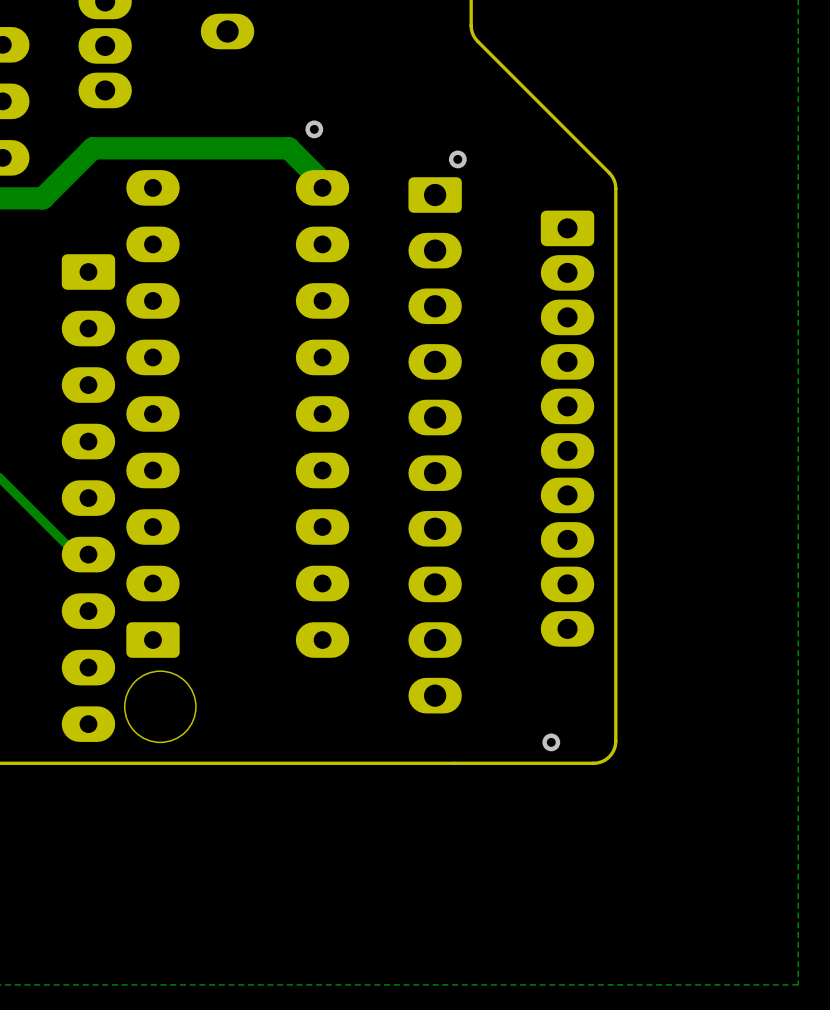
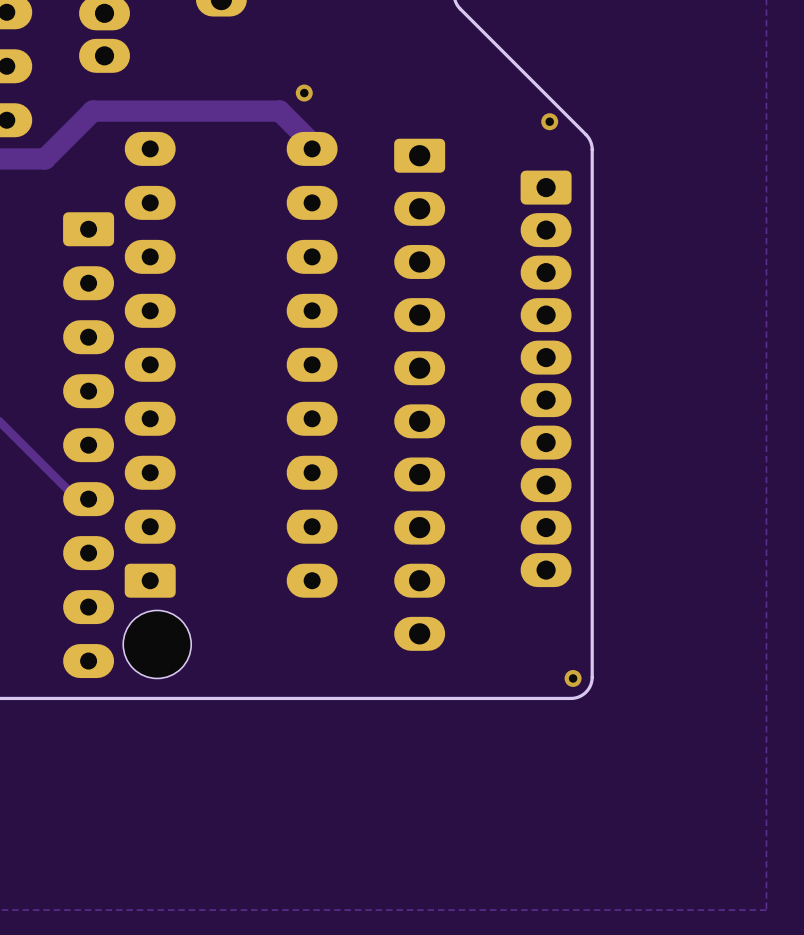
via position: (457, 159) -> (549, 121)
via position: (551, 742) -> (573, 678)

